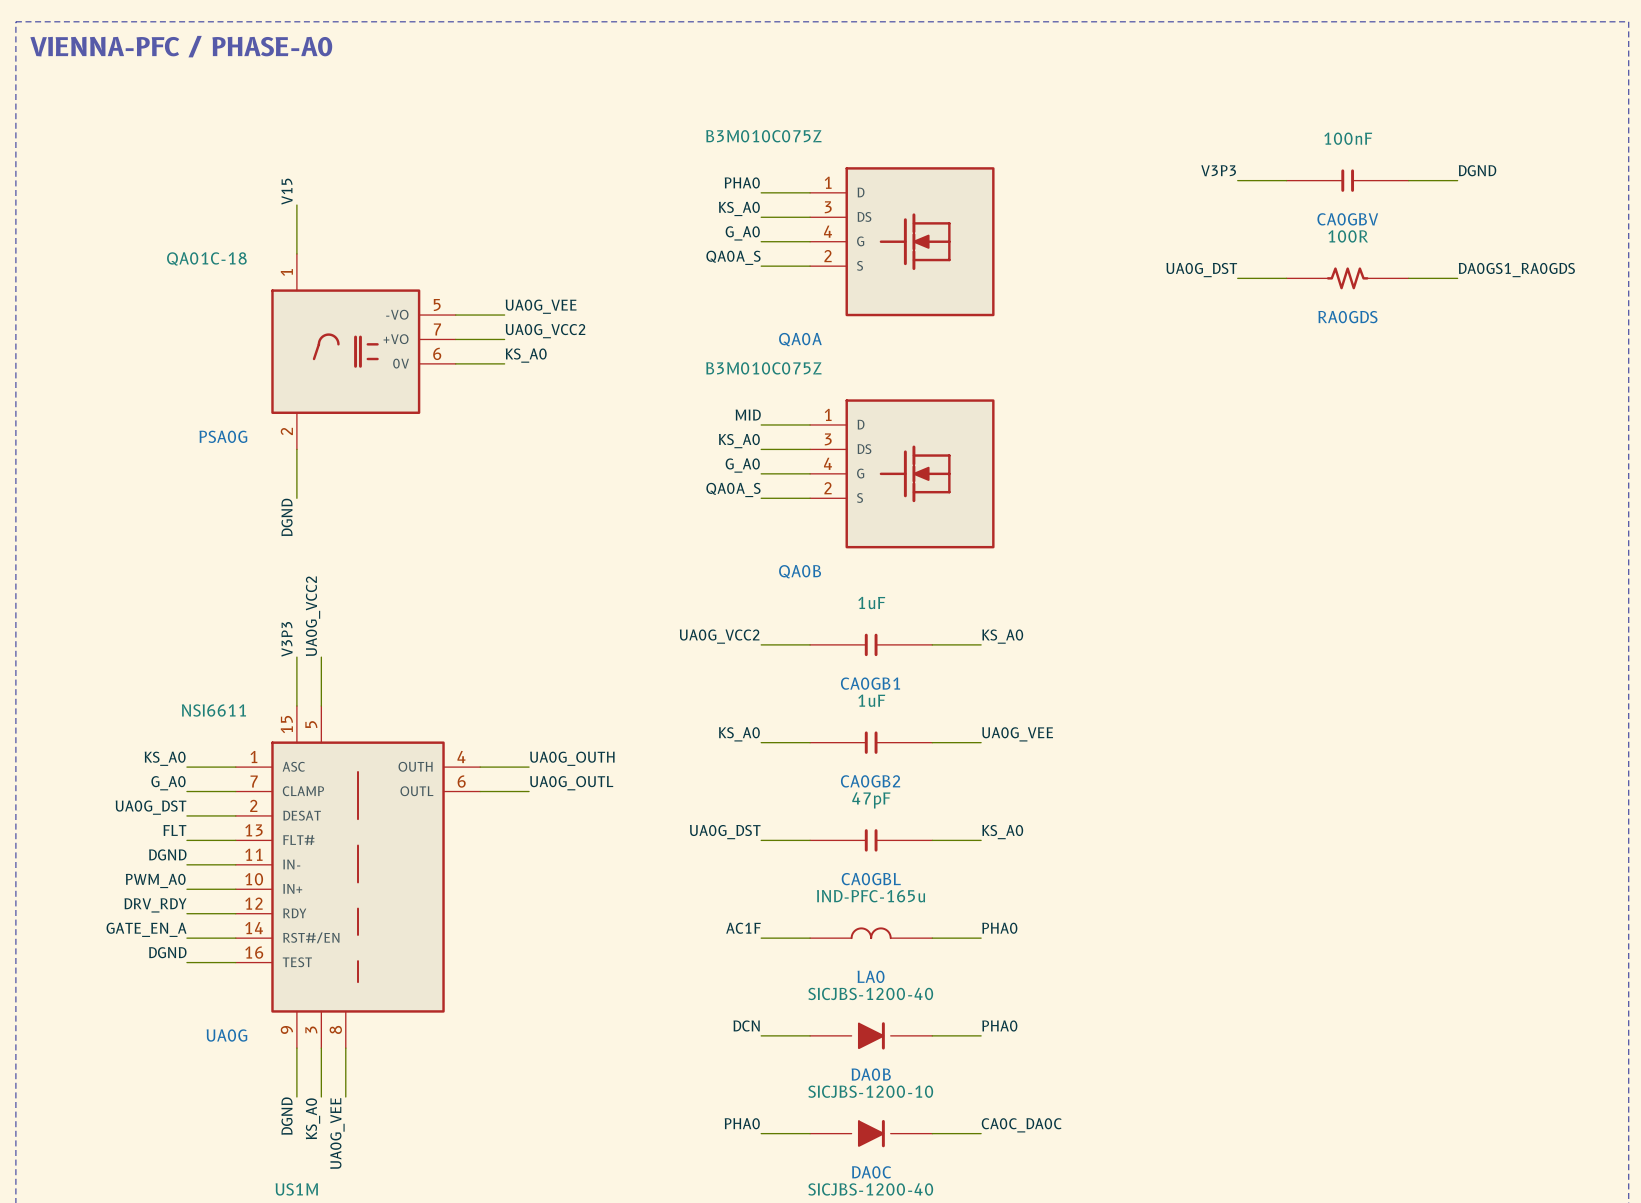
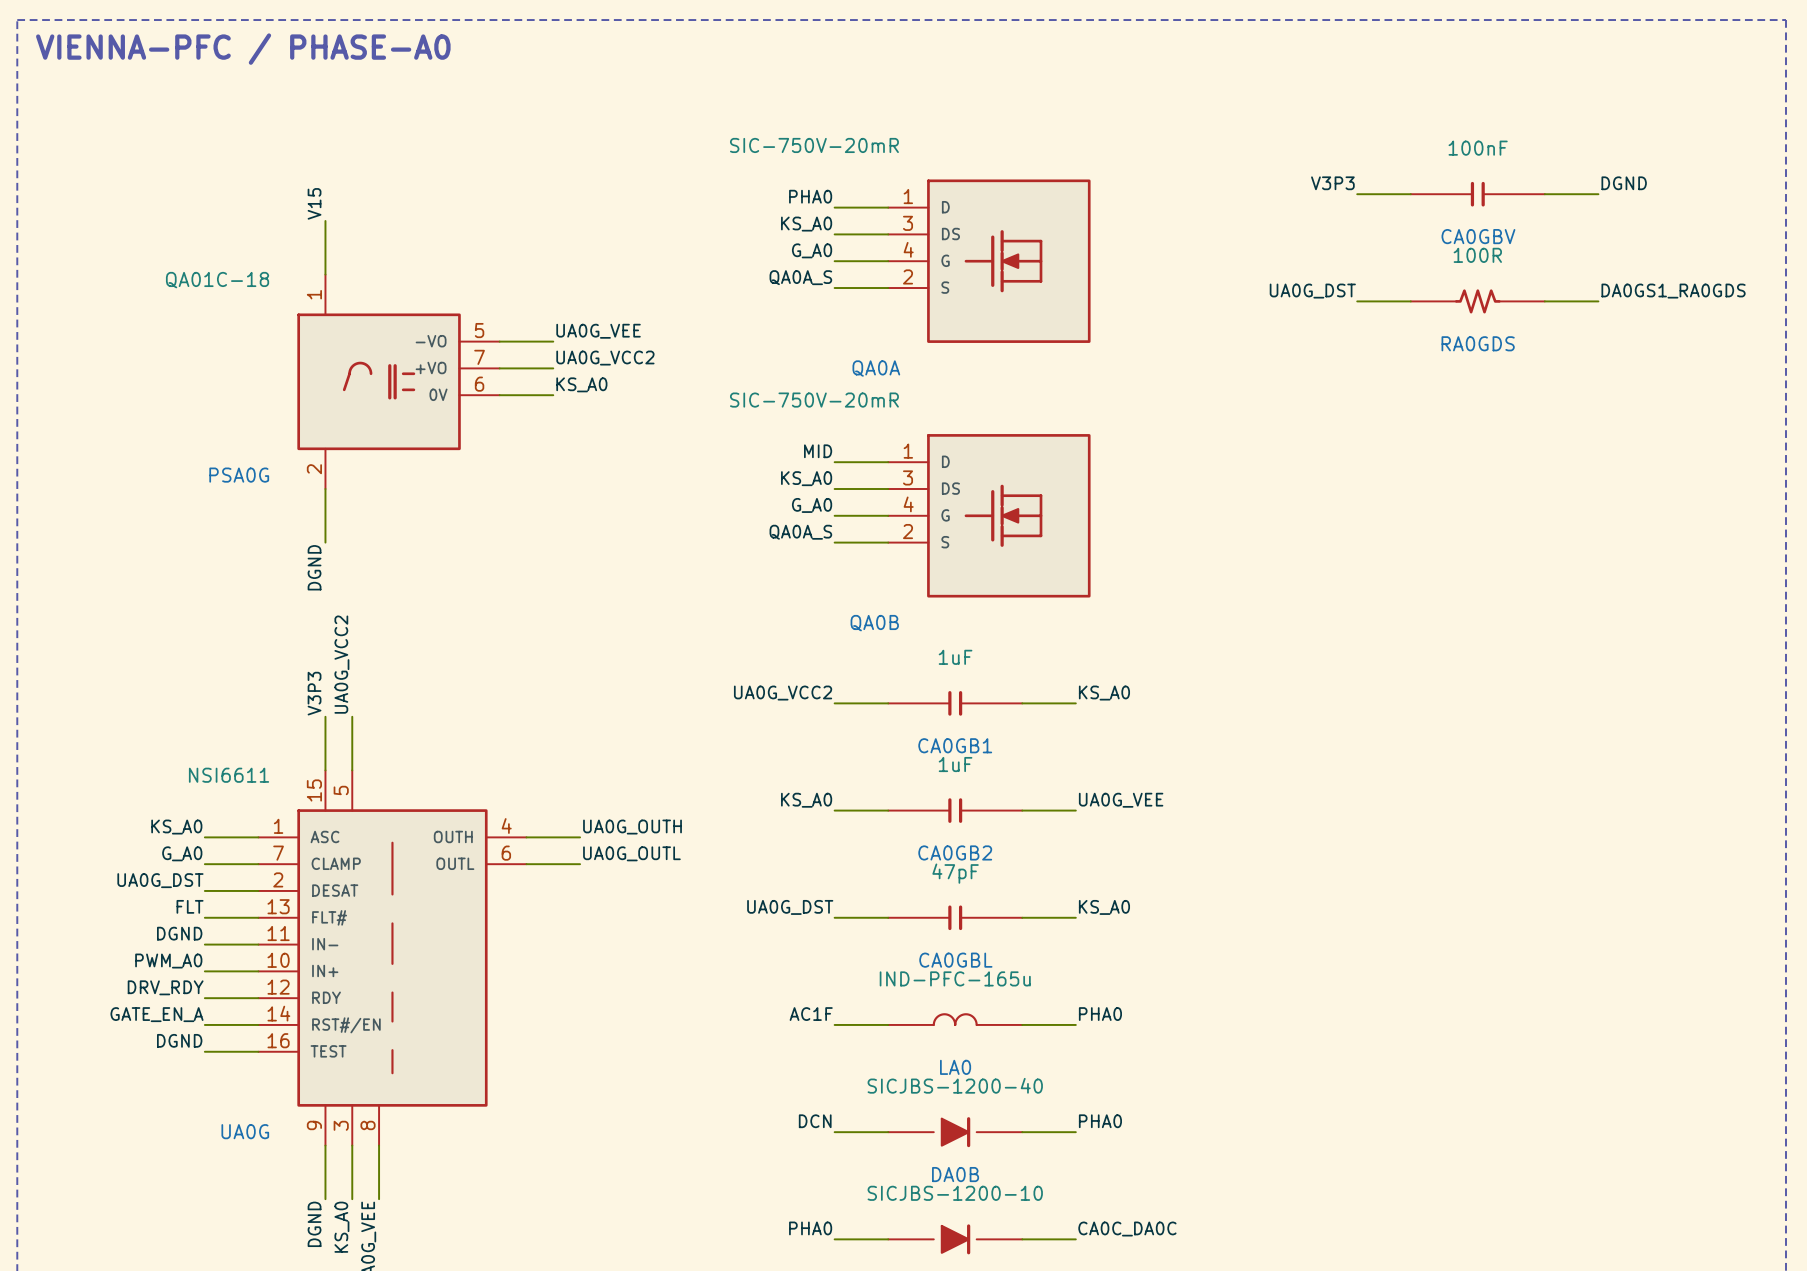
QA0A value: B3M010C075Z (763, 136) -> SIC-750V-20mR (814, 145)
QA0B value: B3M010C075Z (763, 368) -> SIC-750V-20mR (814, 400)

